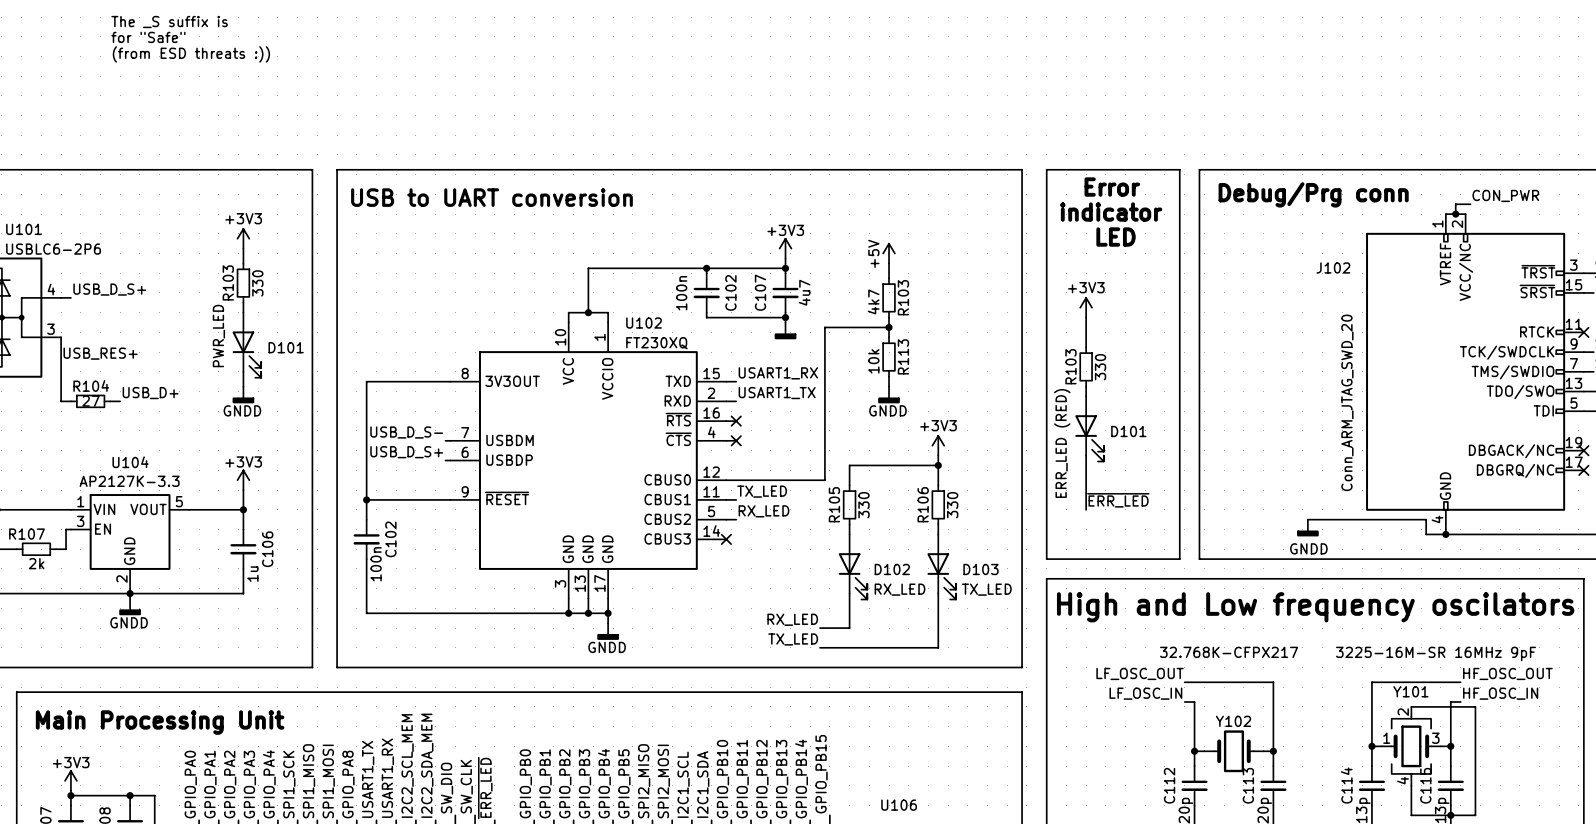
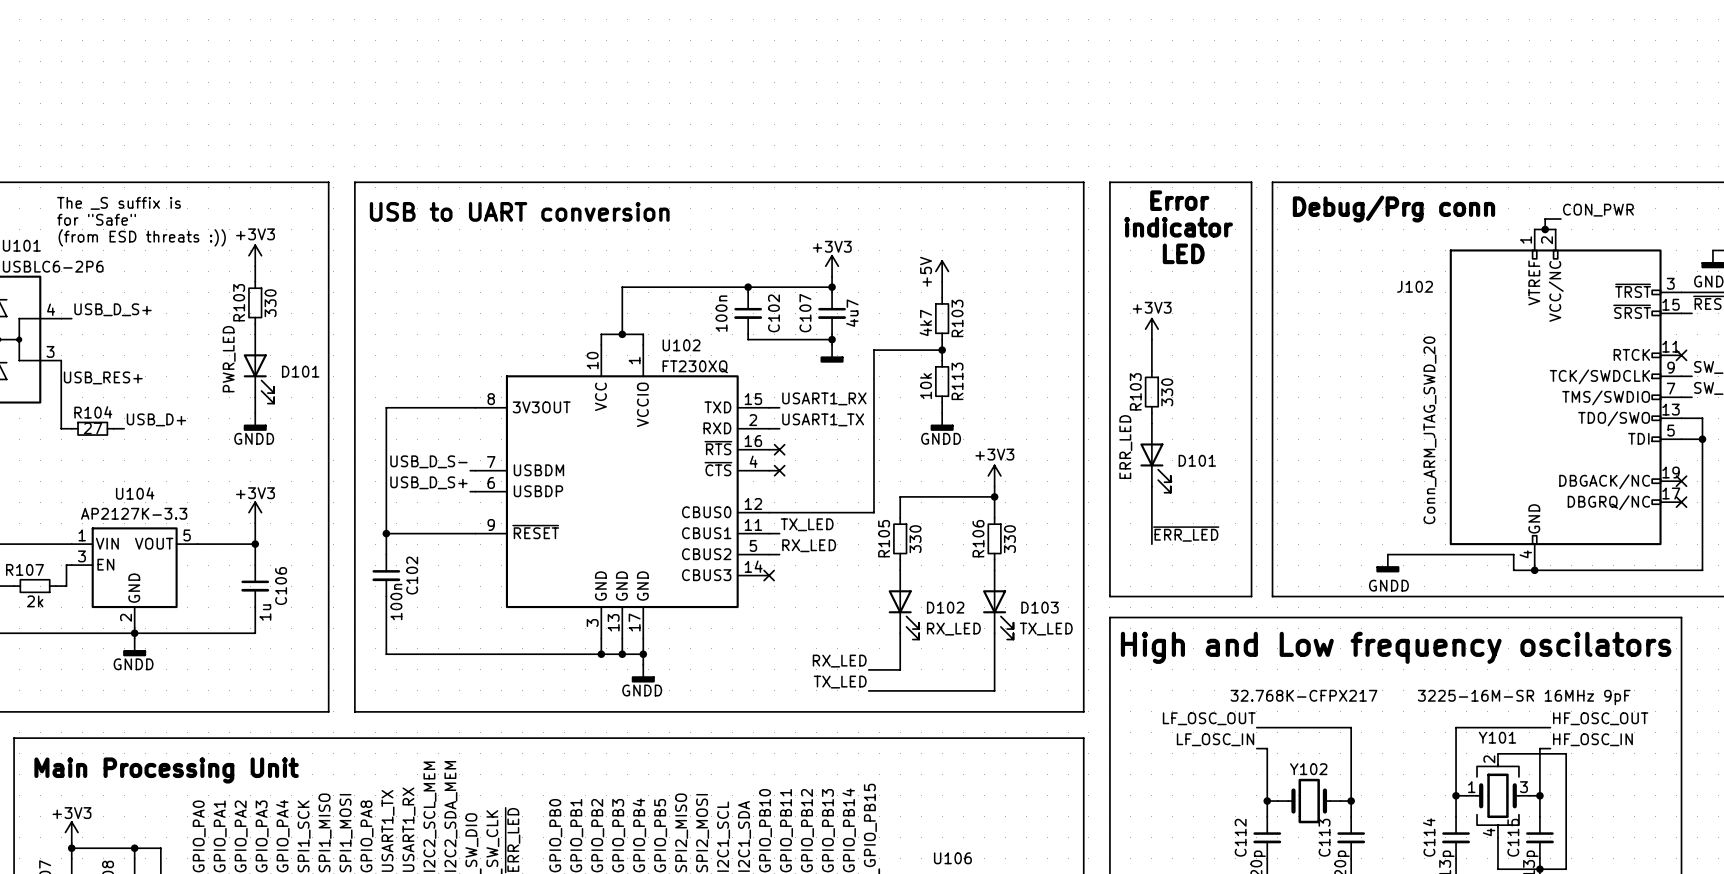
text position: The _S suffix is (169, 22) -> The _S suffix is (119, 203)
text position: for "Safe" (148, 37) -> for "Safe" (96, 219)
text position: (from ESD threats :)) (191, 54) -> (from ESD threats :)) (142, 237)
D101 value: ERR_LED (RED) (1062, 443) -> ERR_LED (1125, 447)

